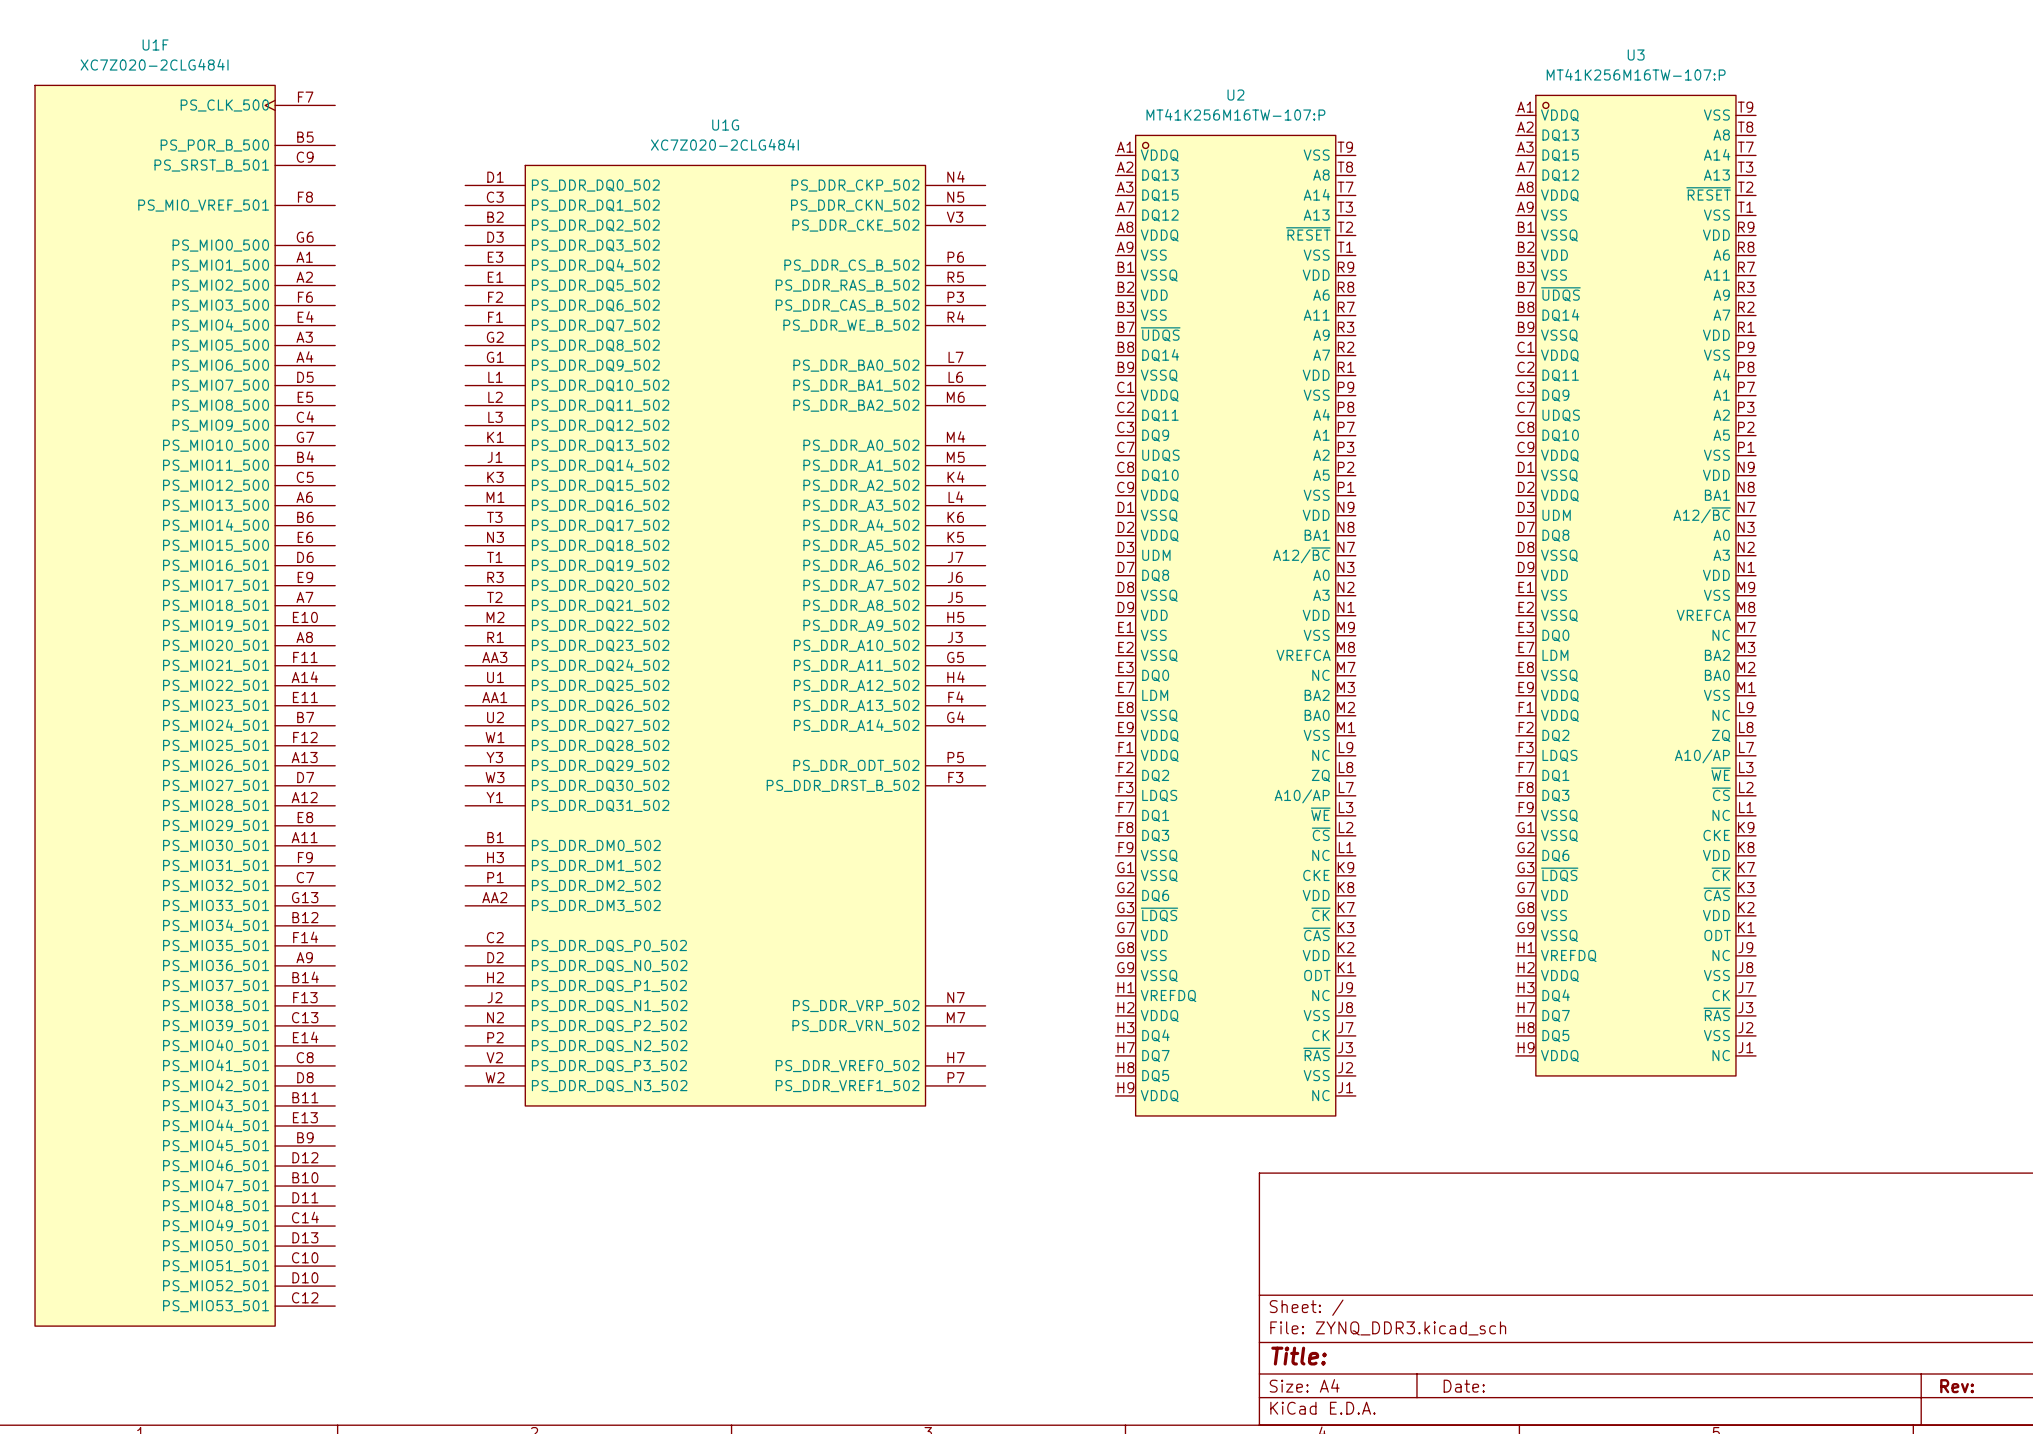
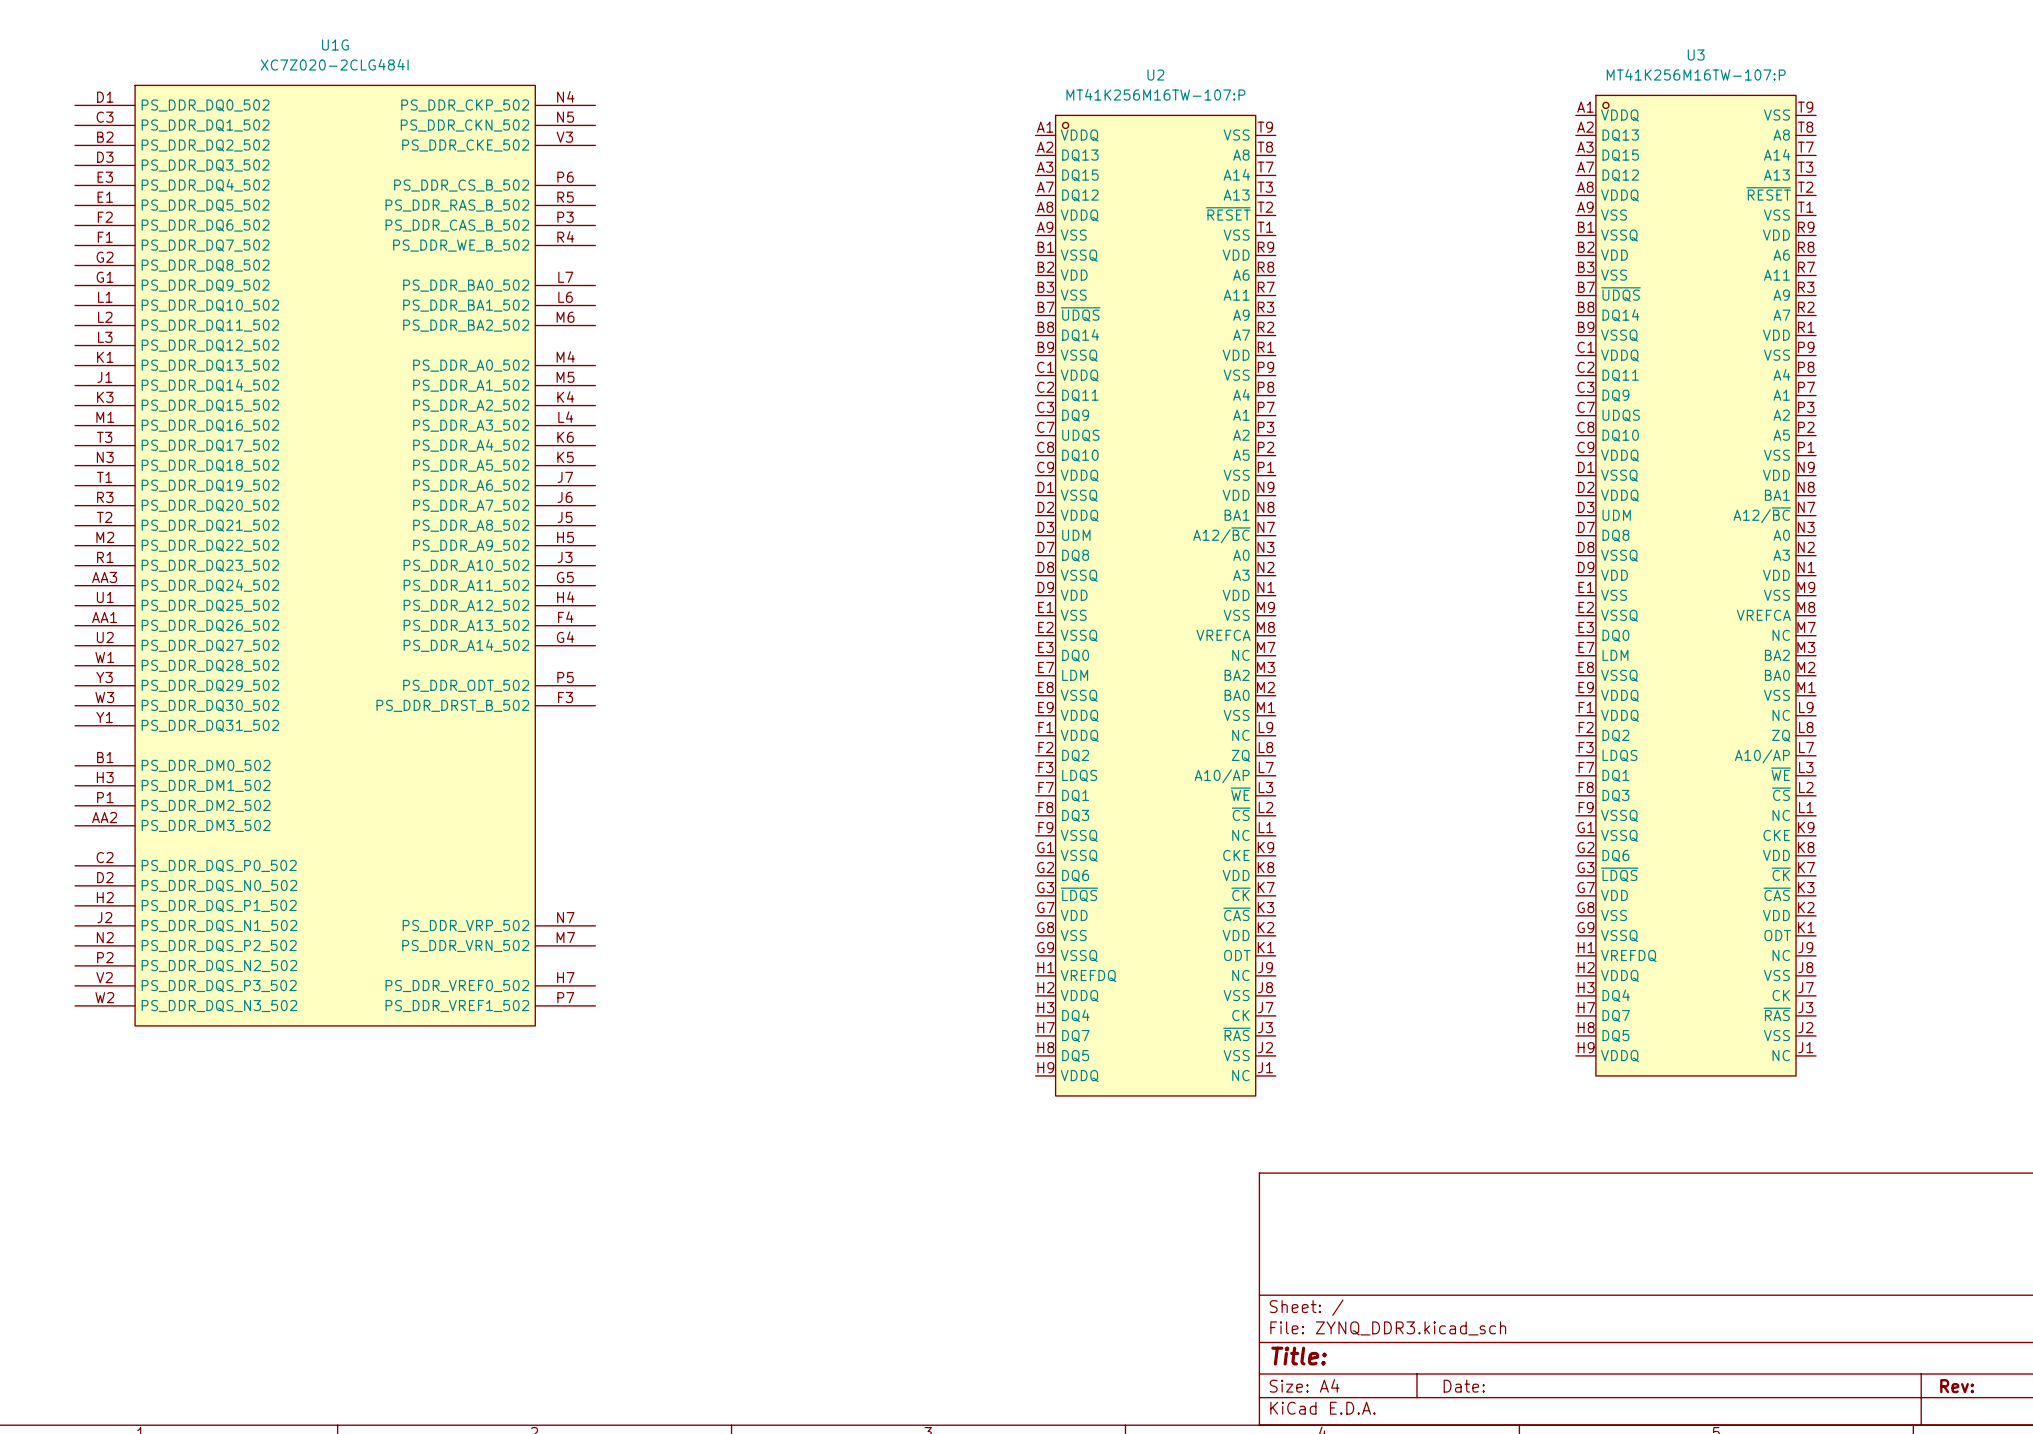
U3 position: (1635, 585) -> (1695, 585)
U2 position: (1235, 625) -> (1155, 605)
U1G position: (725, 635) -> (335, 555)
U1F: XC7Z020-2CLG484I (185, 705) -> none

